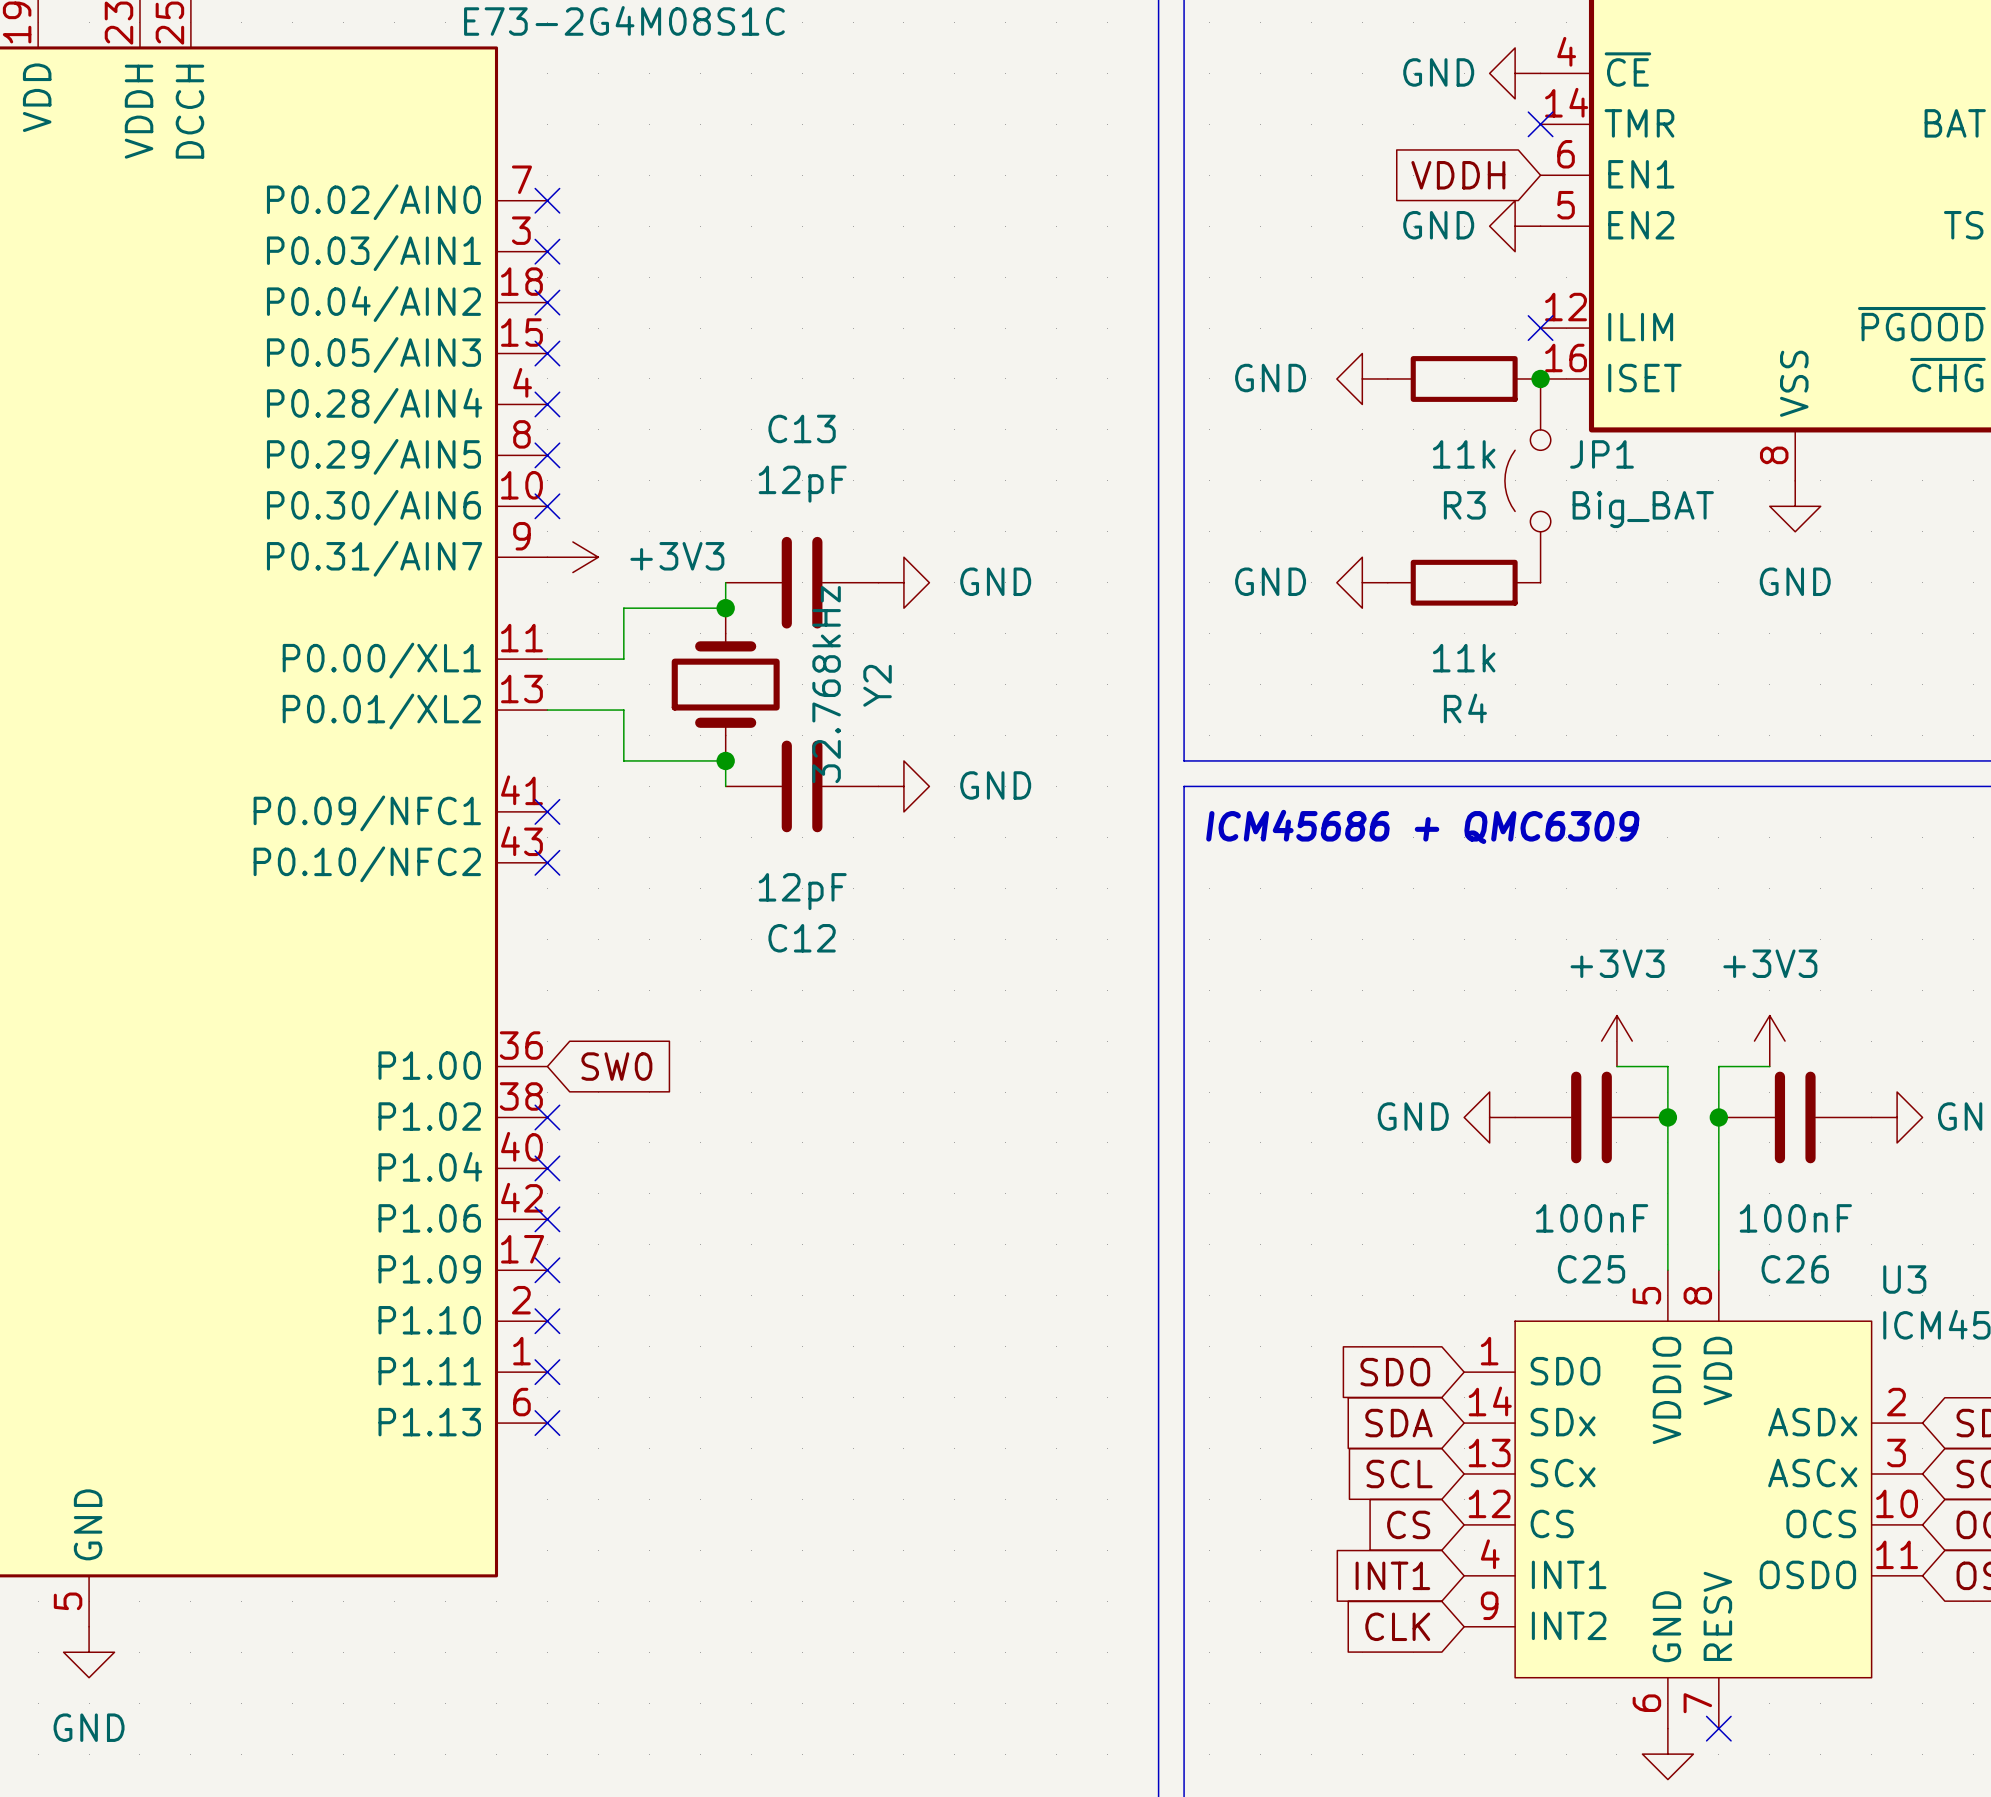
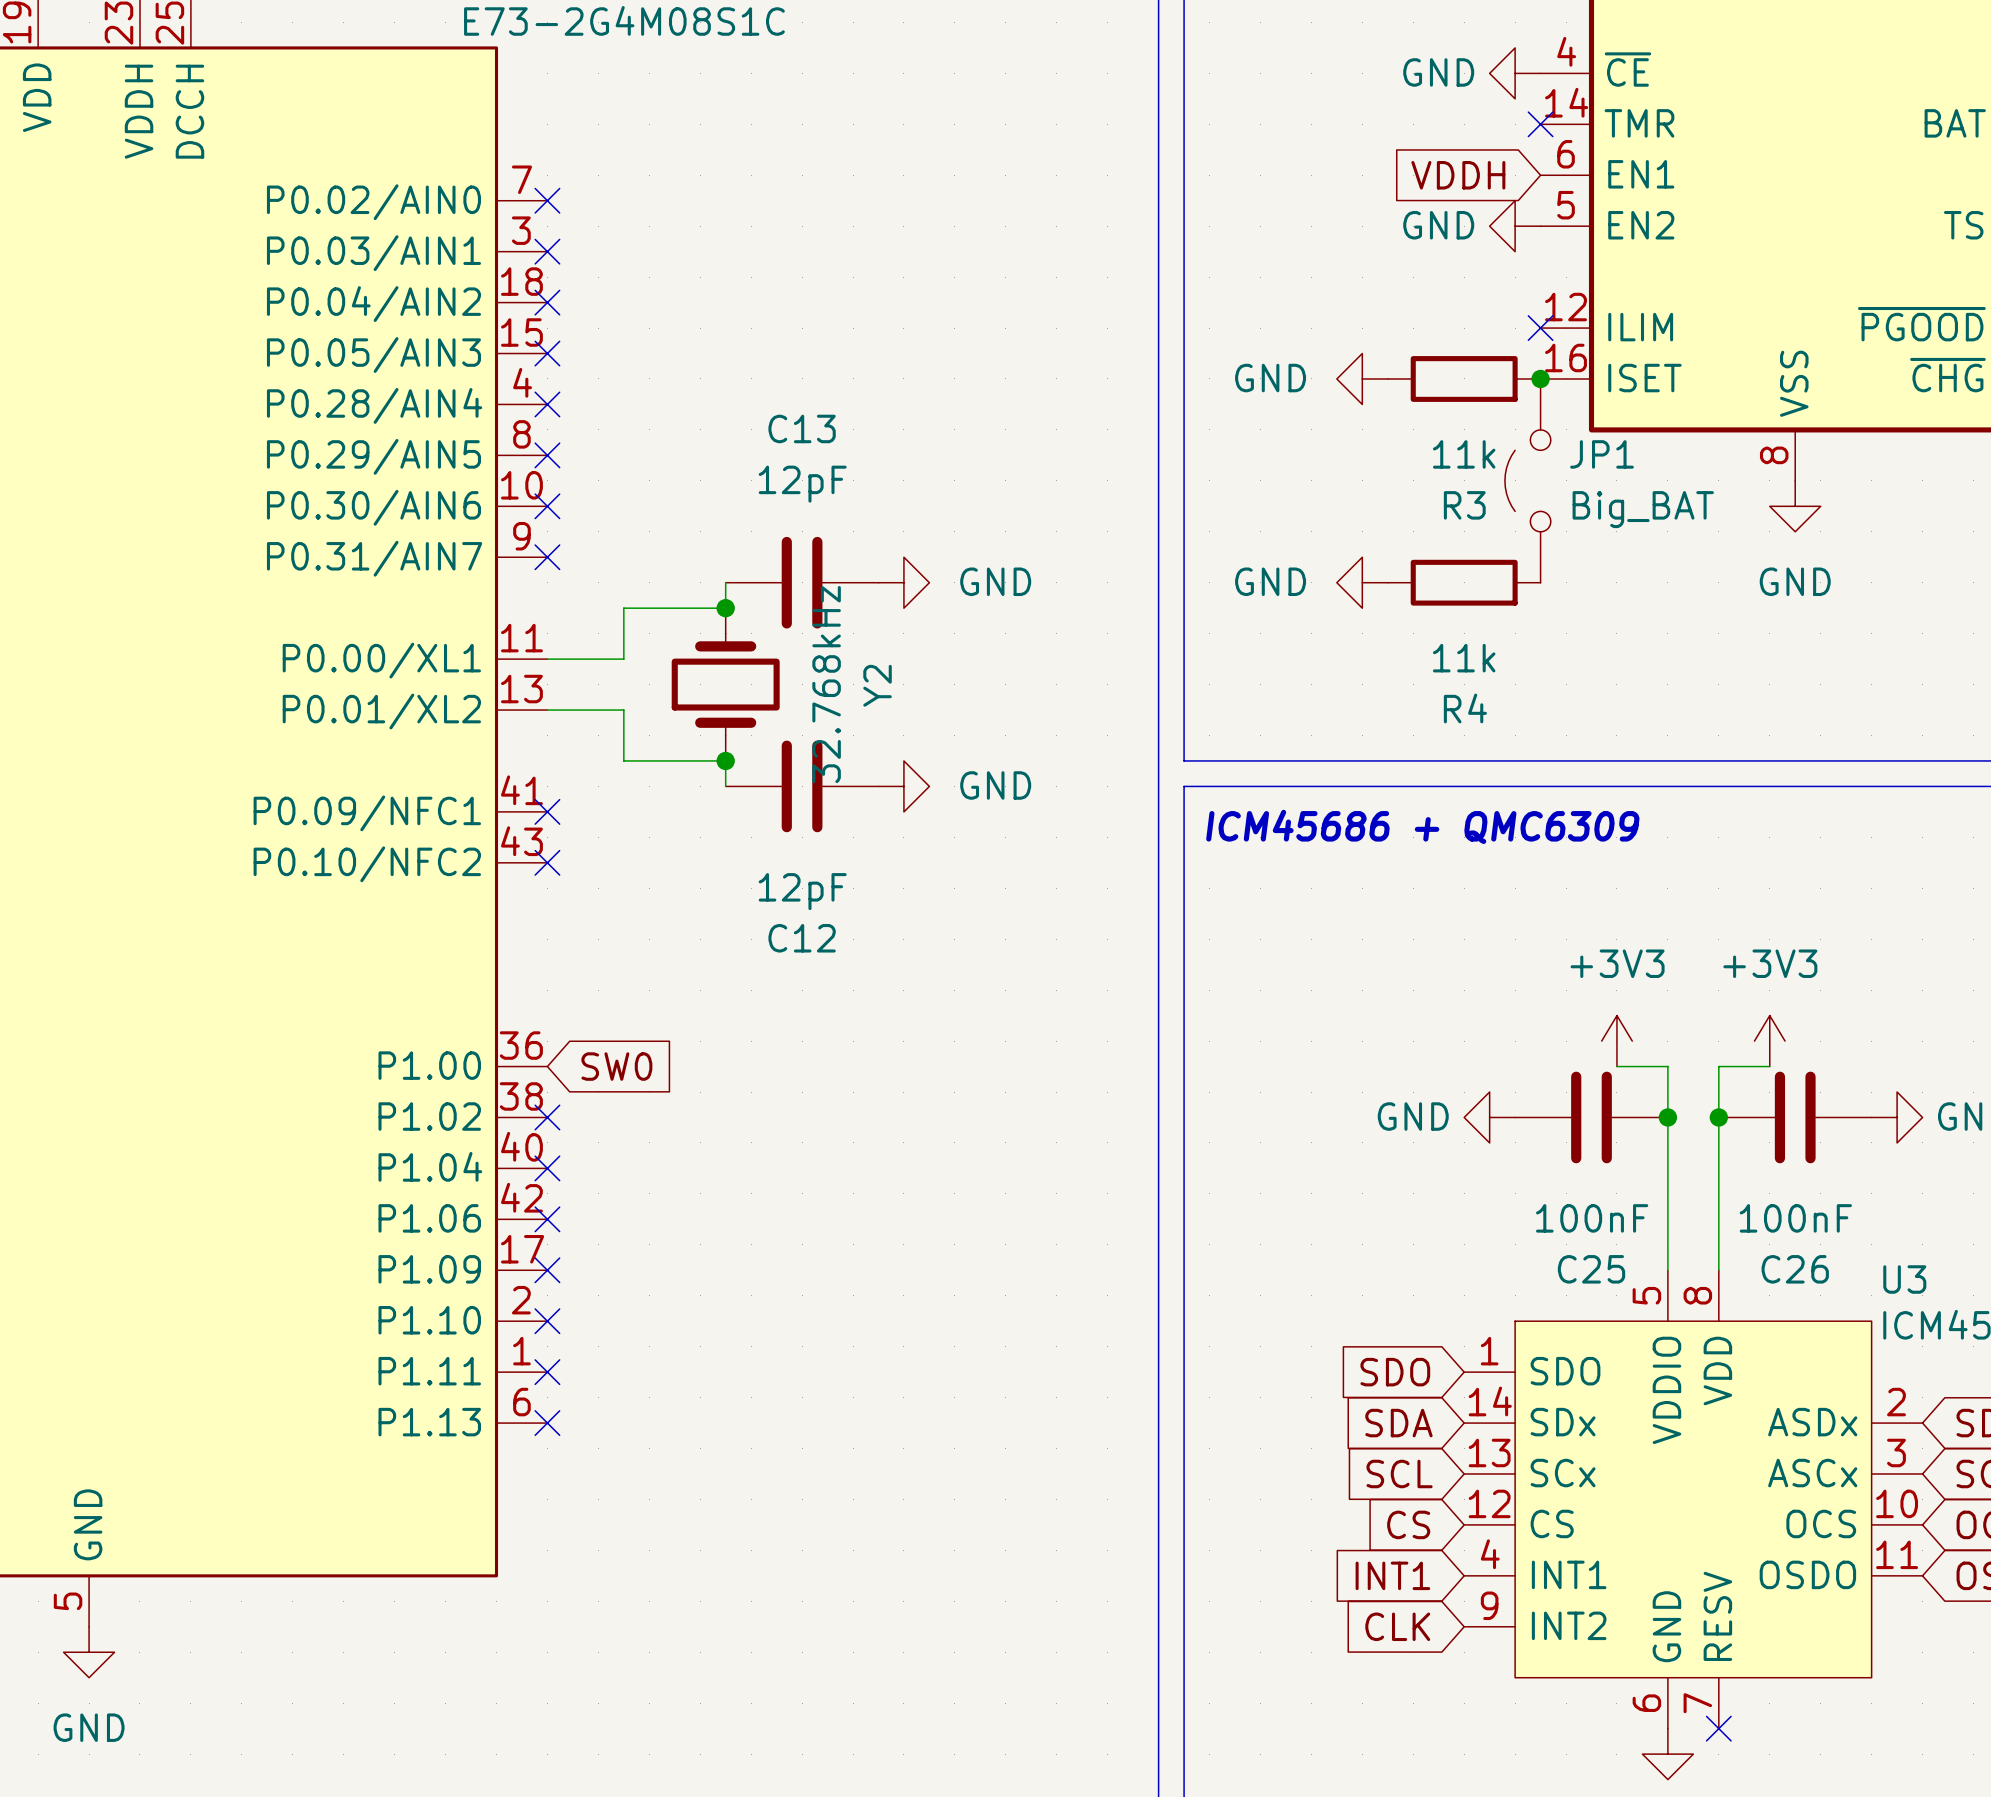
no-connect mark: none -> (547, 557)
power symbol: +3V3 (572, 557) -> none

